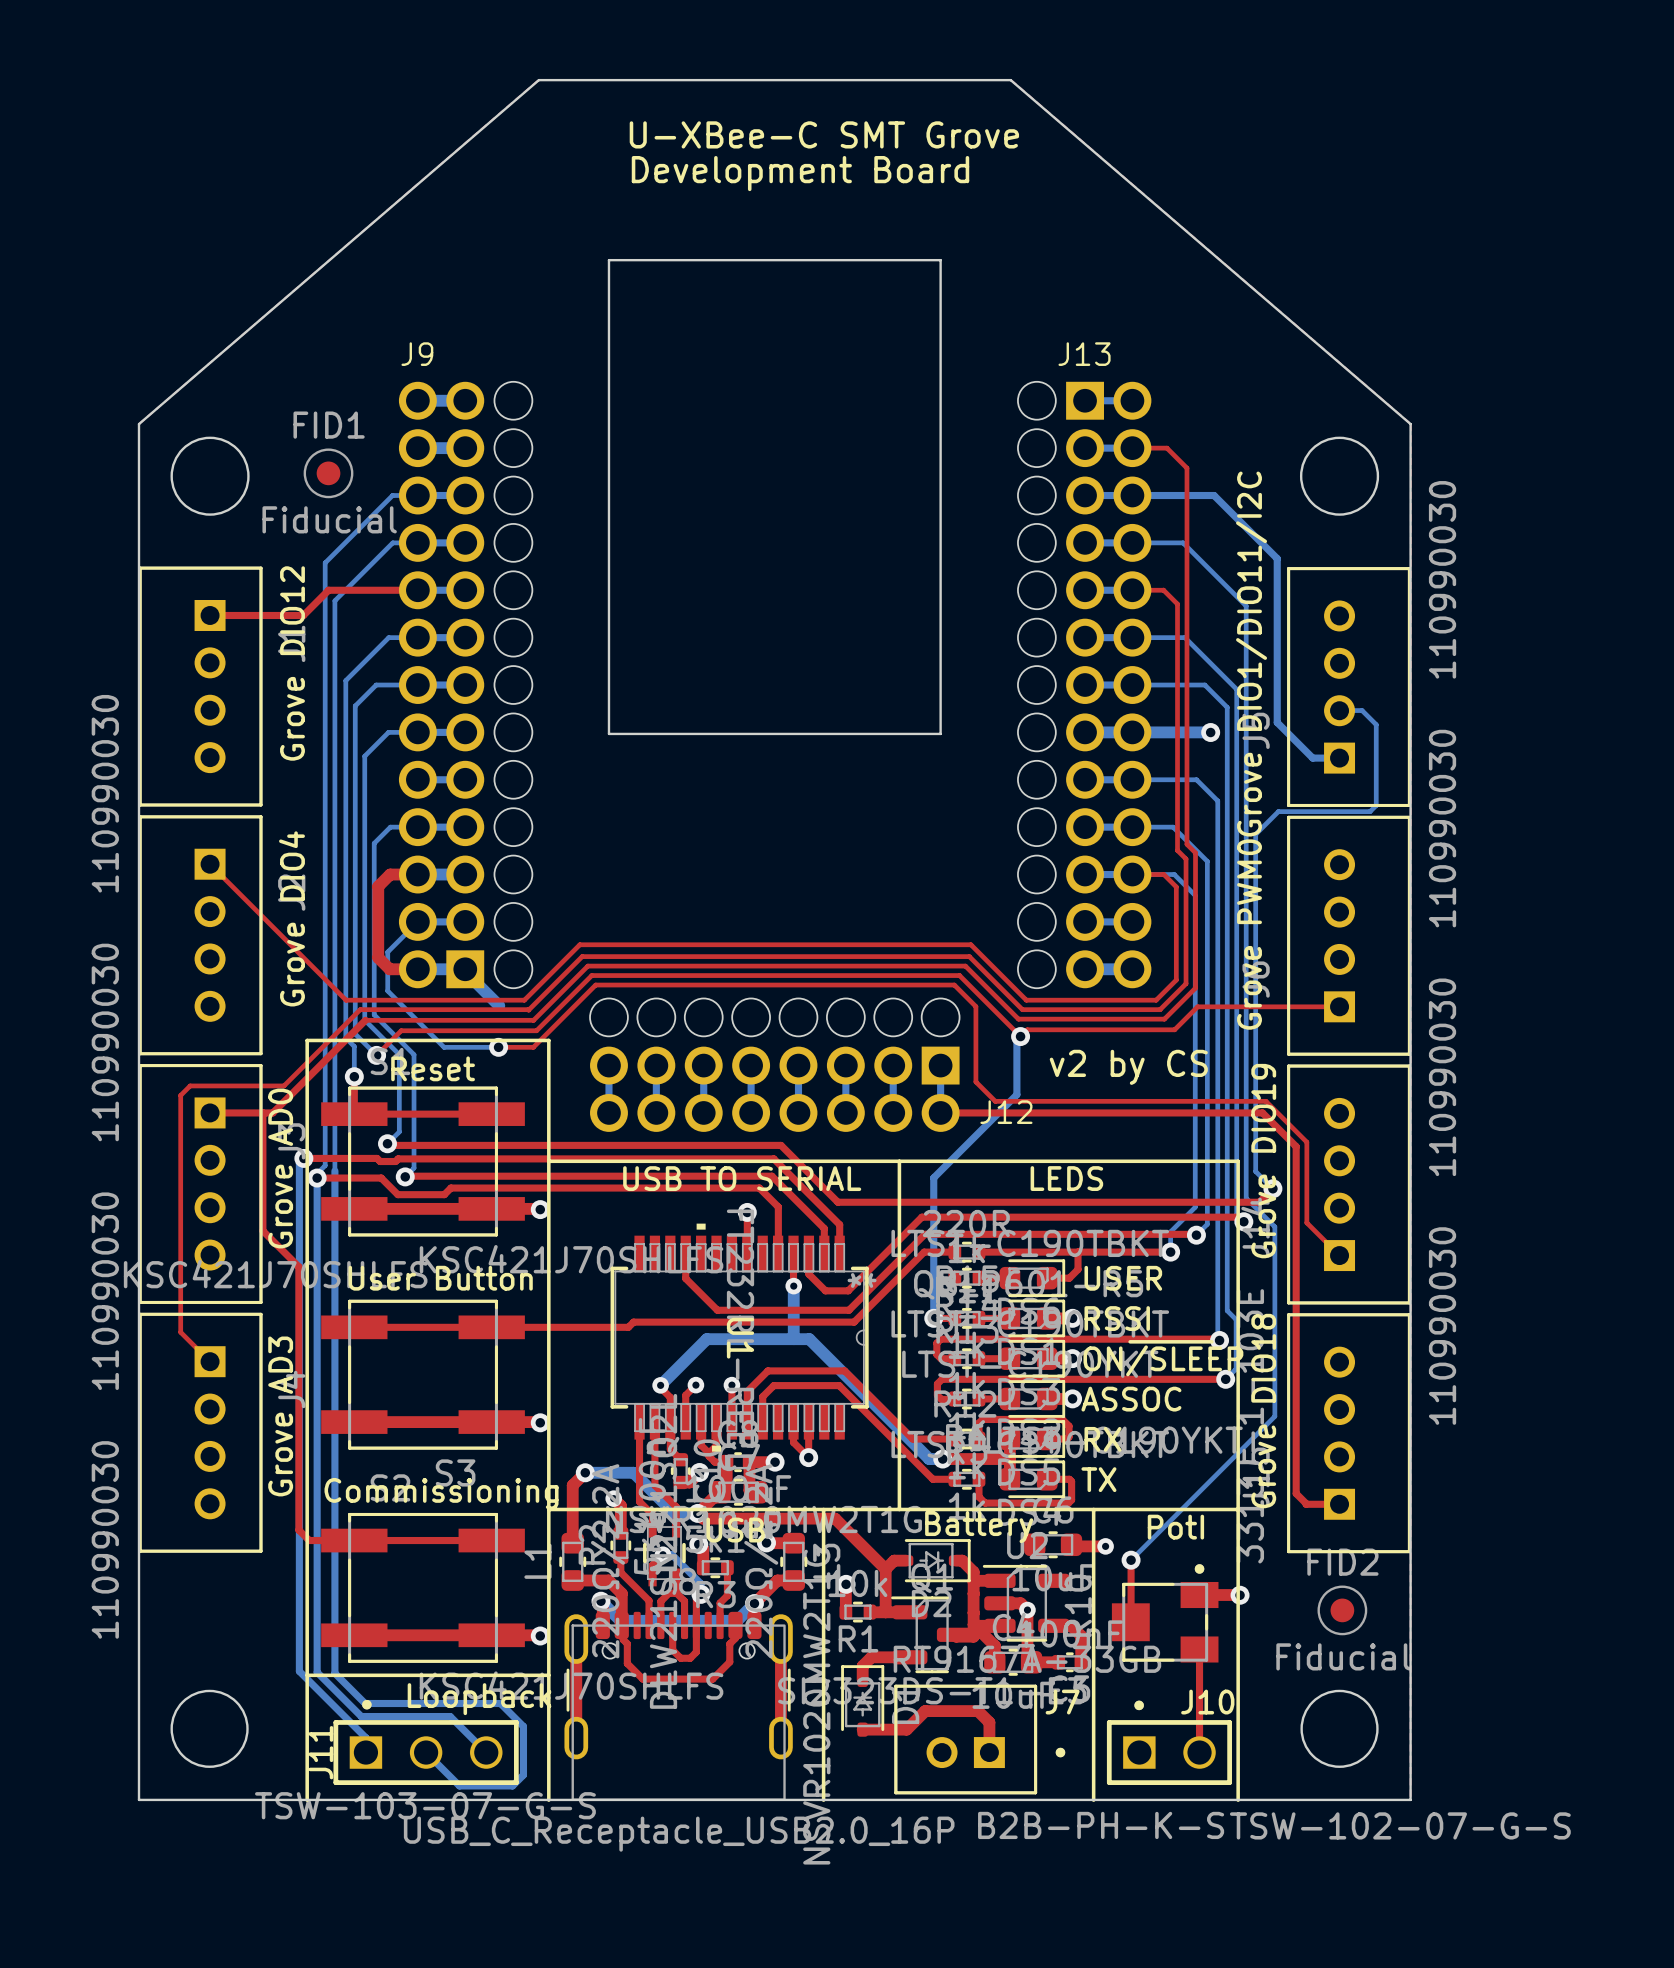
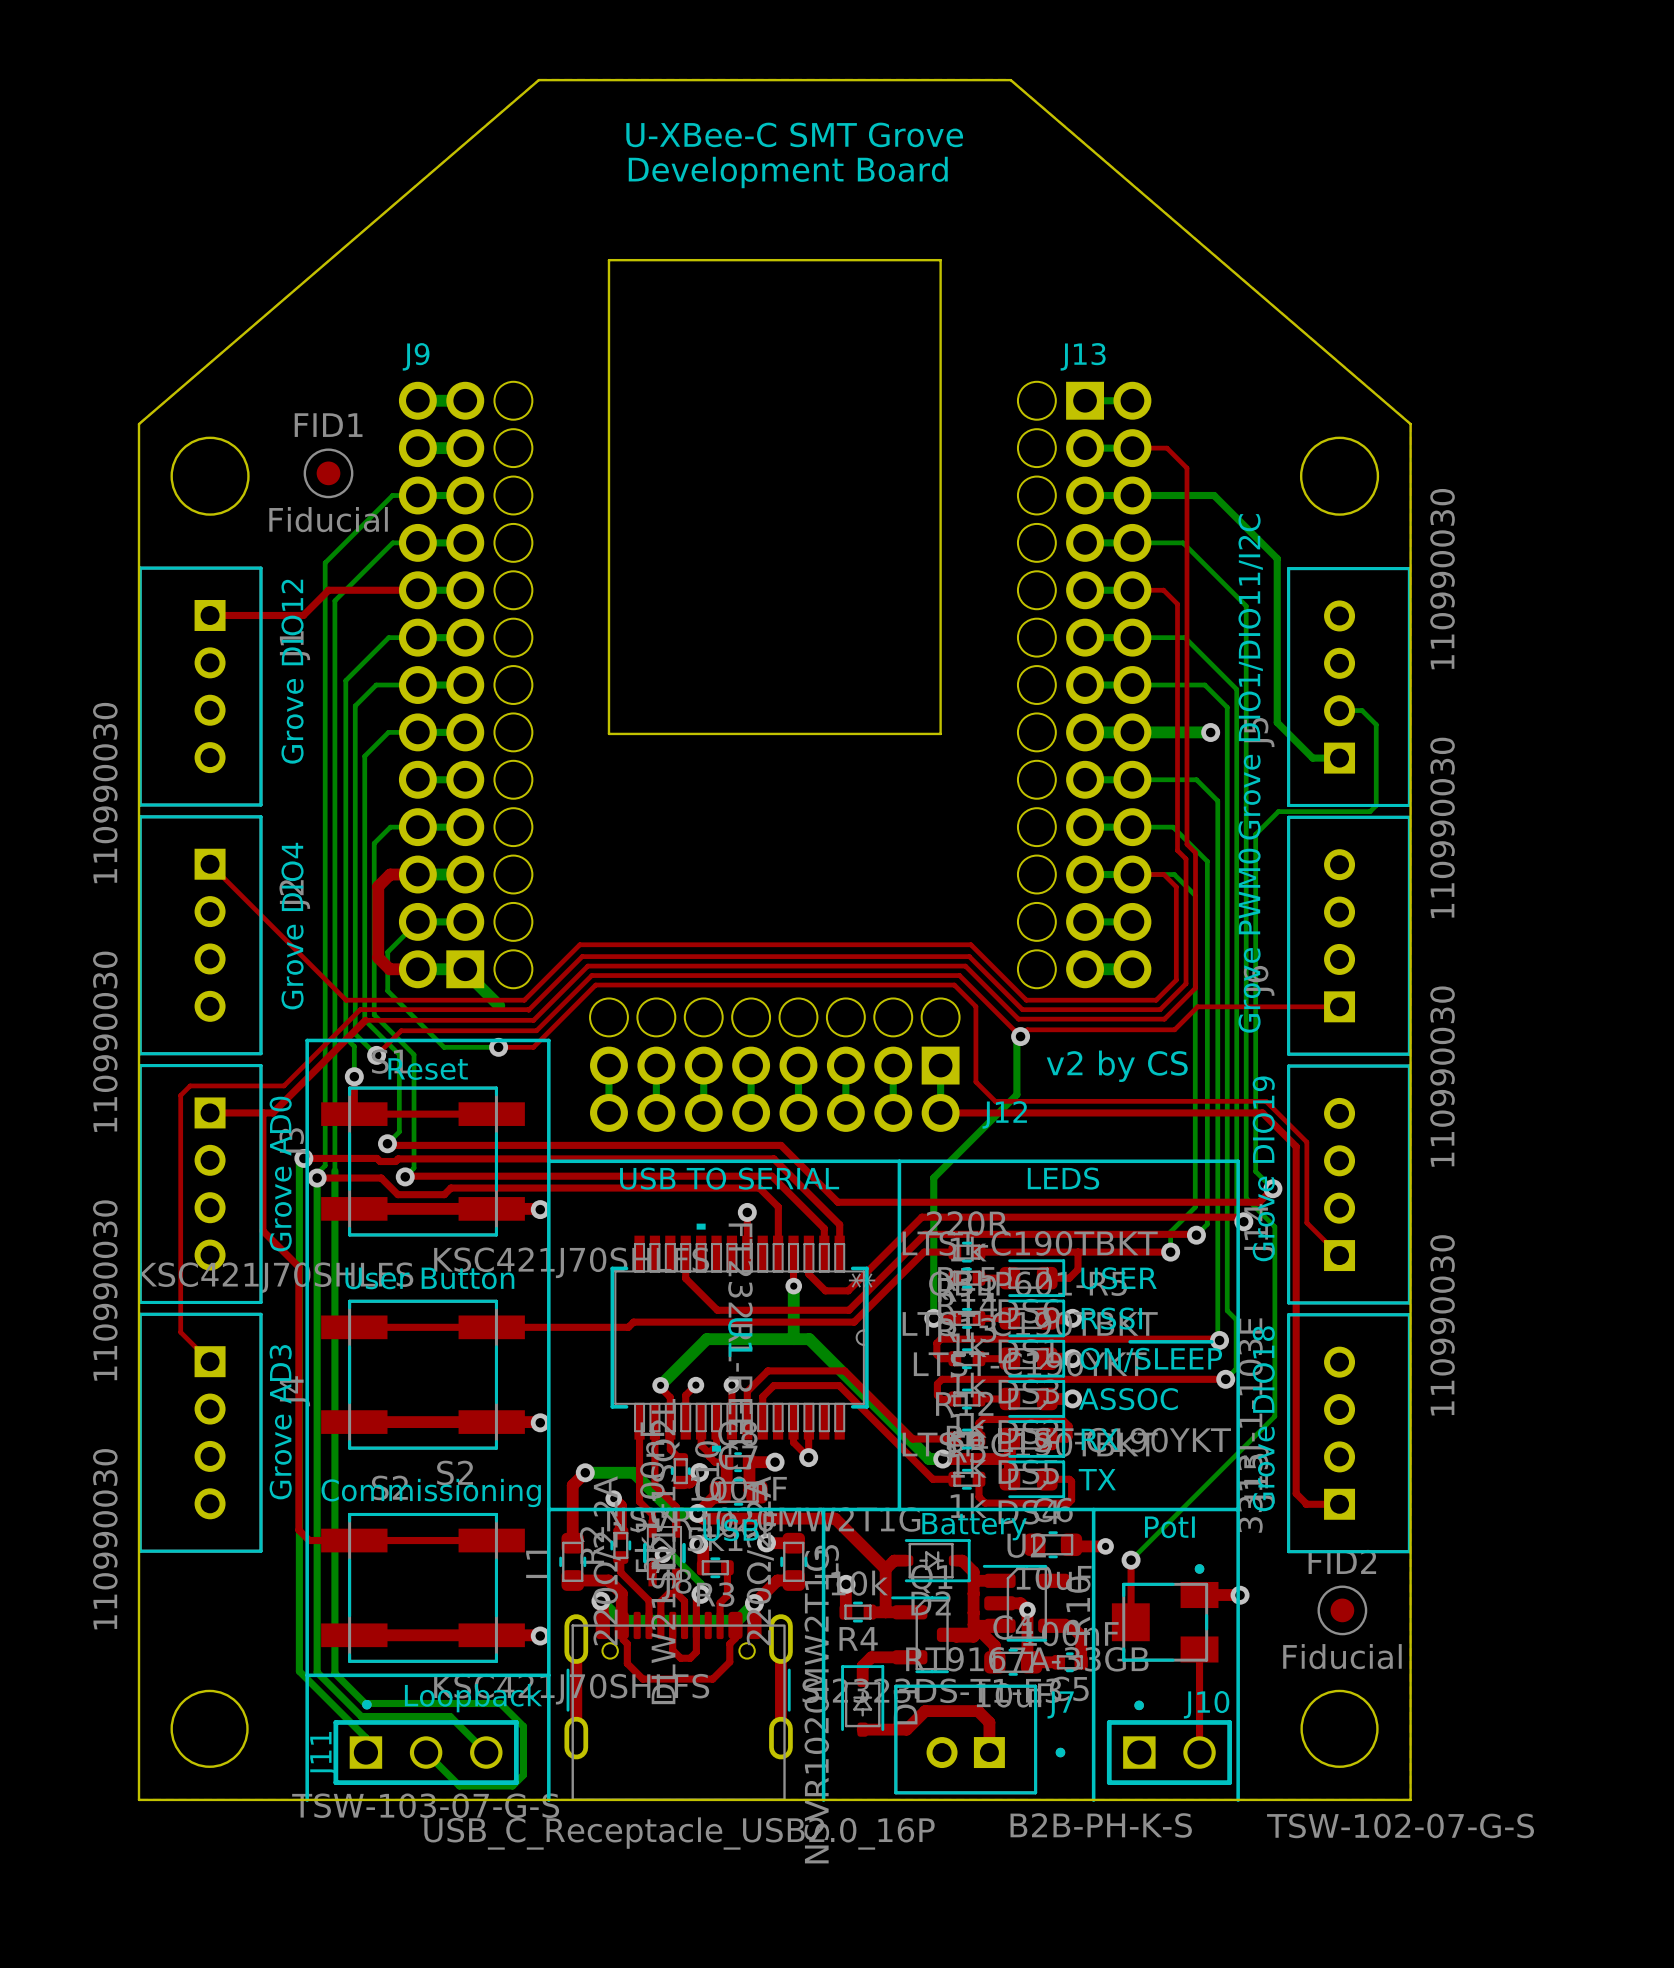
S3 name: S3 (455, 1472) -> S2 (455, 1472)
R1 name: R1 (858, 1638) -> R4 (858, 1638)

